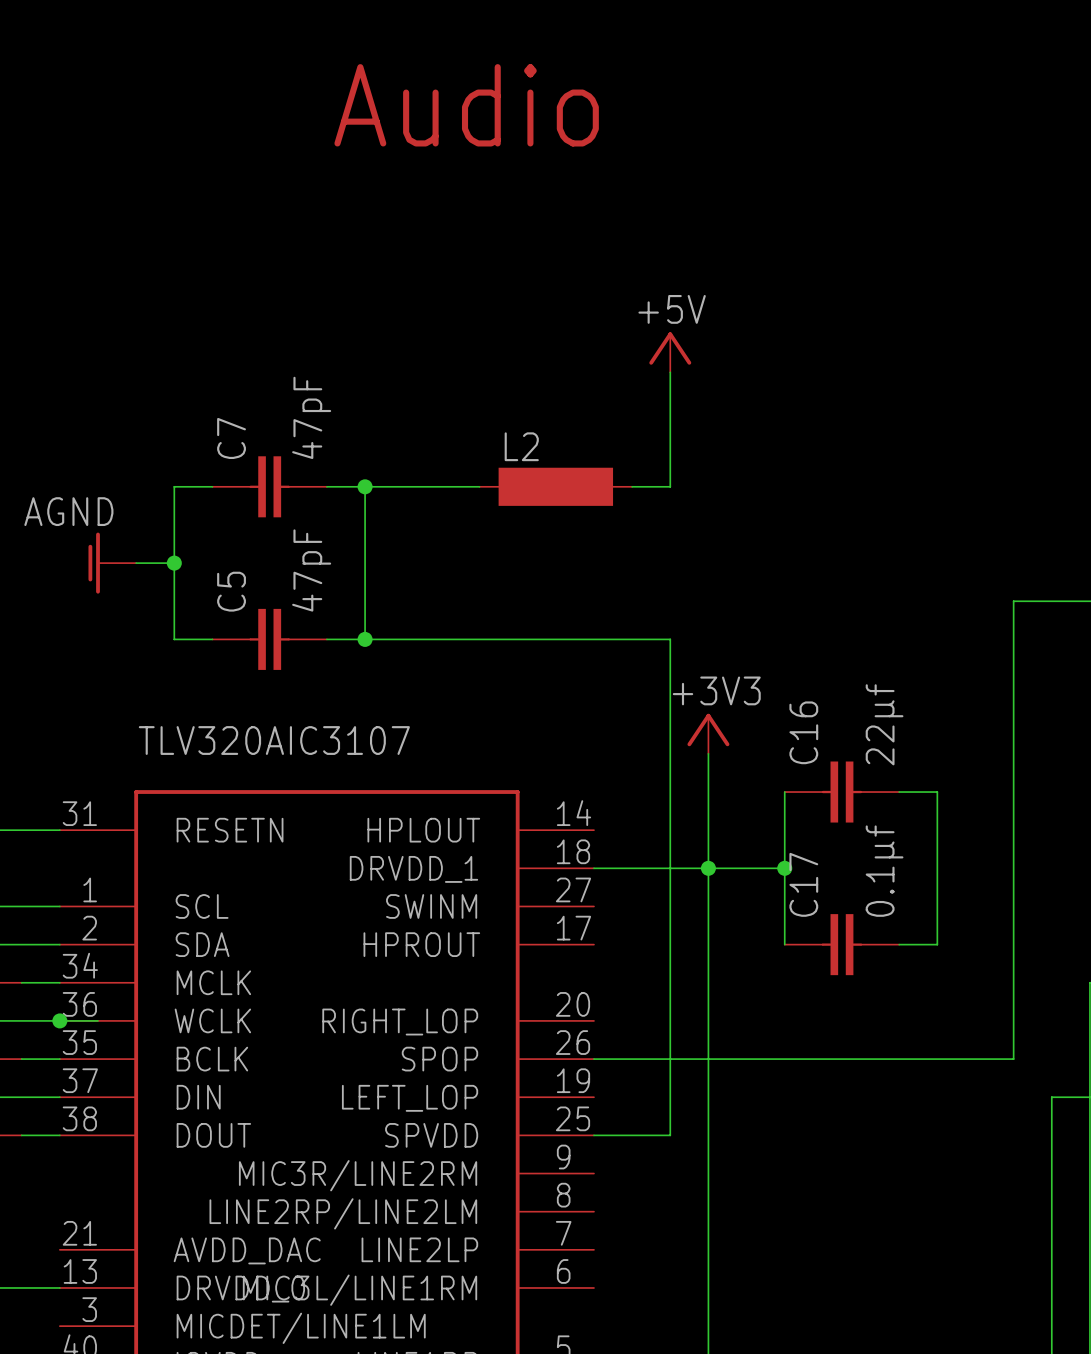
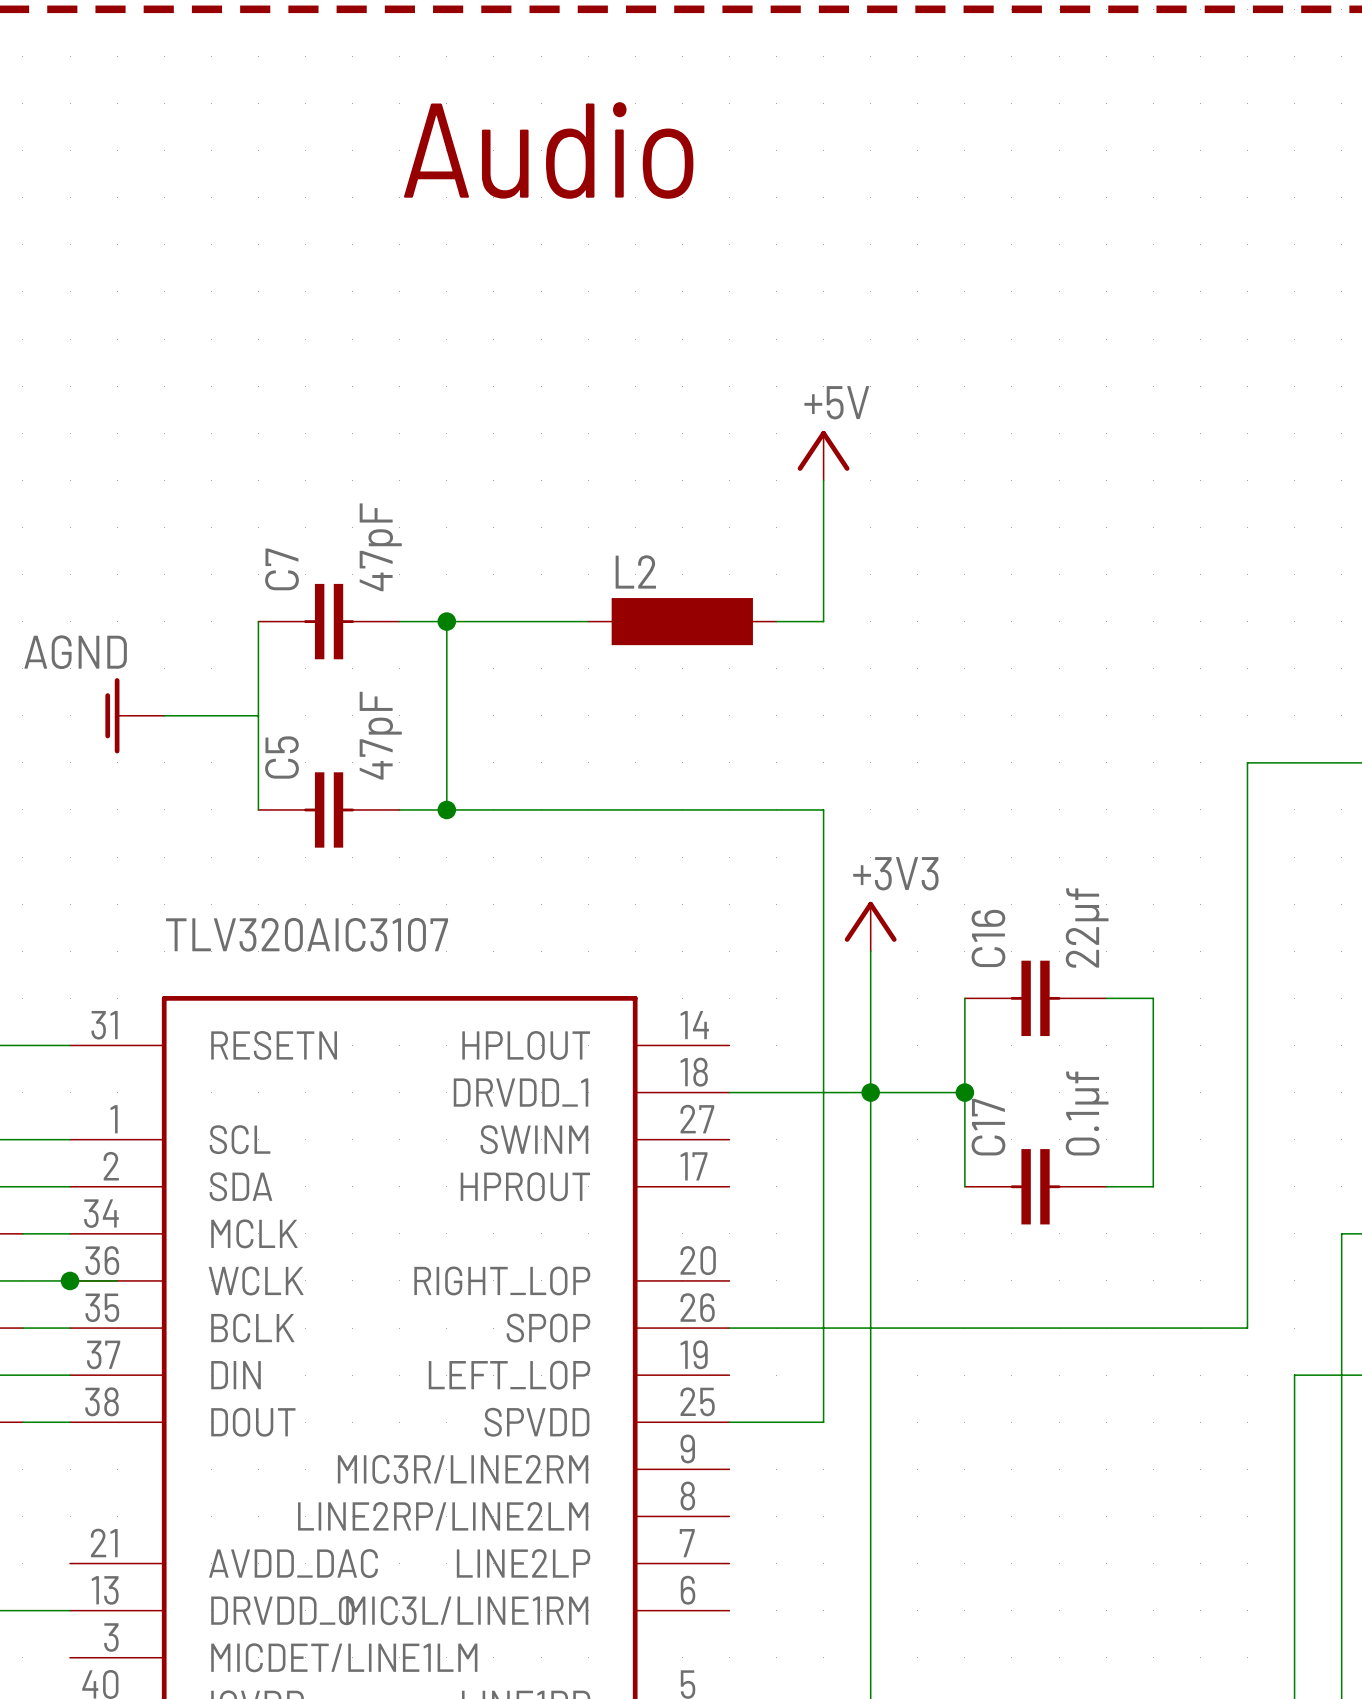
wire: (212, 486) (174, 486) (174, 639) (212, 639) -> (258, 621) (258, 809)
wire: none -> (211, 715) (258, 715)
junction: (174, 563) -> none

